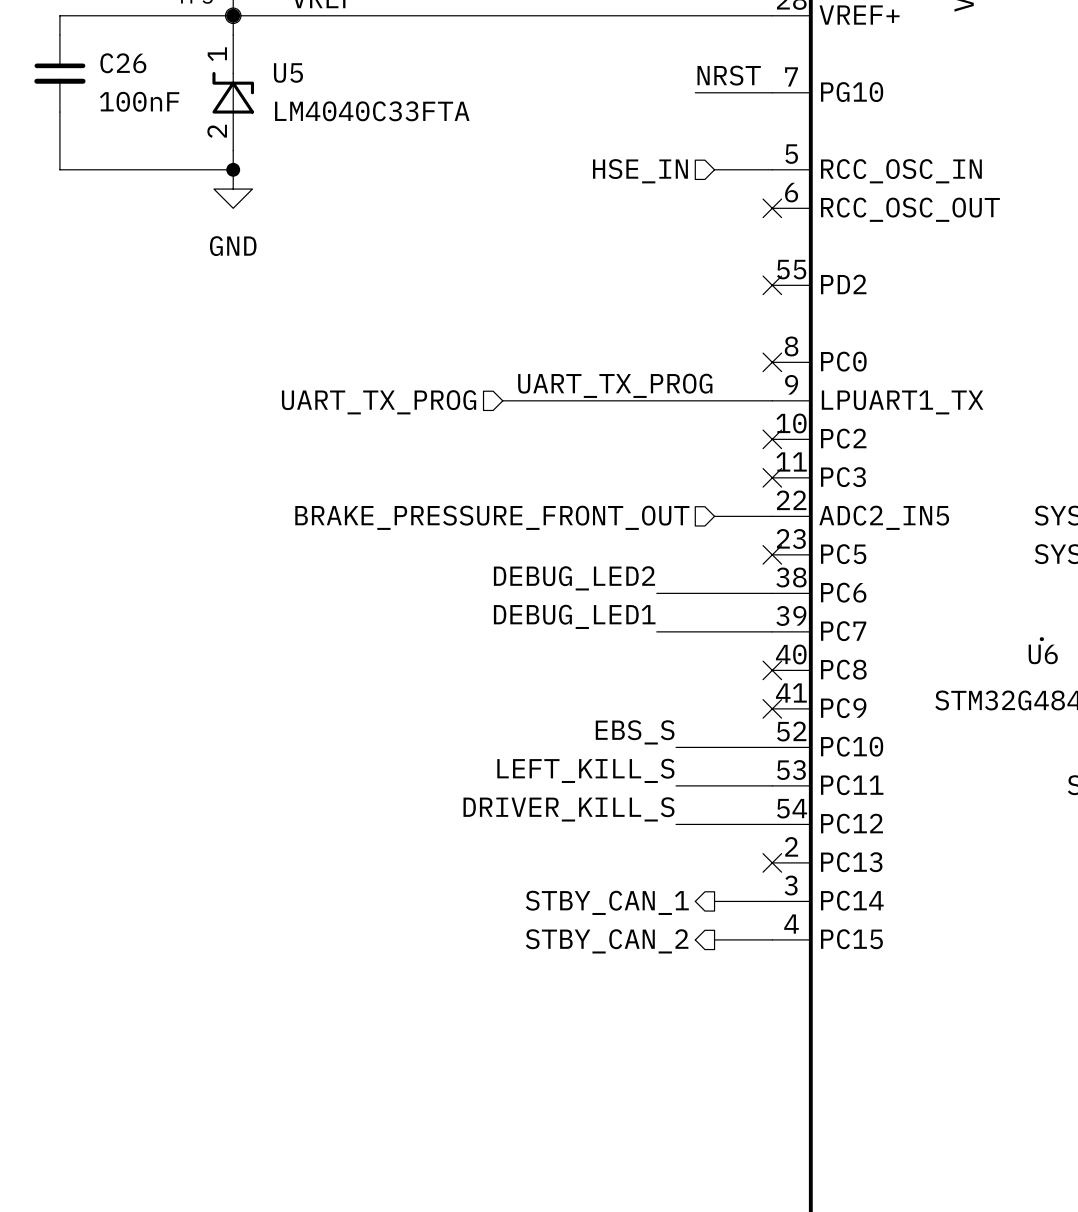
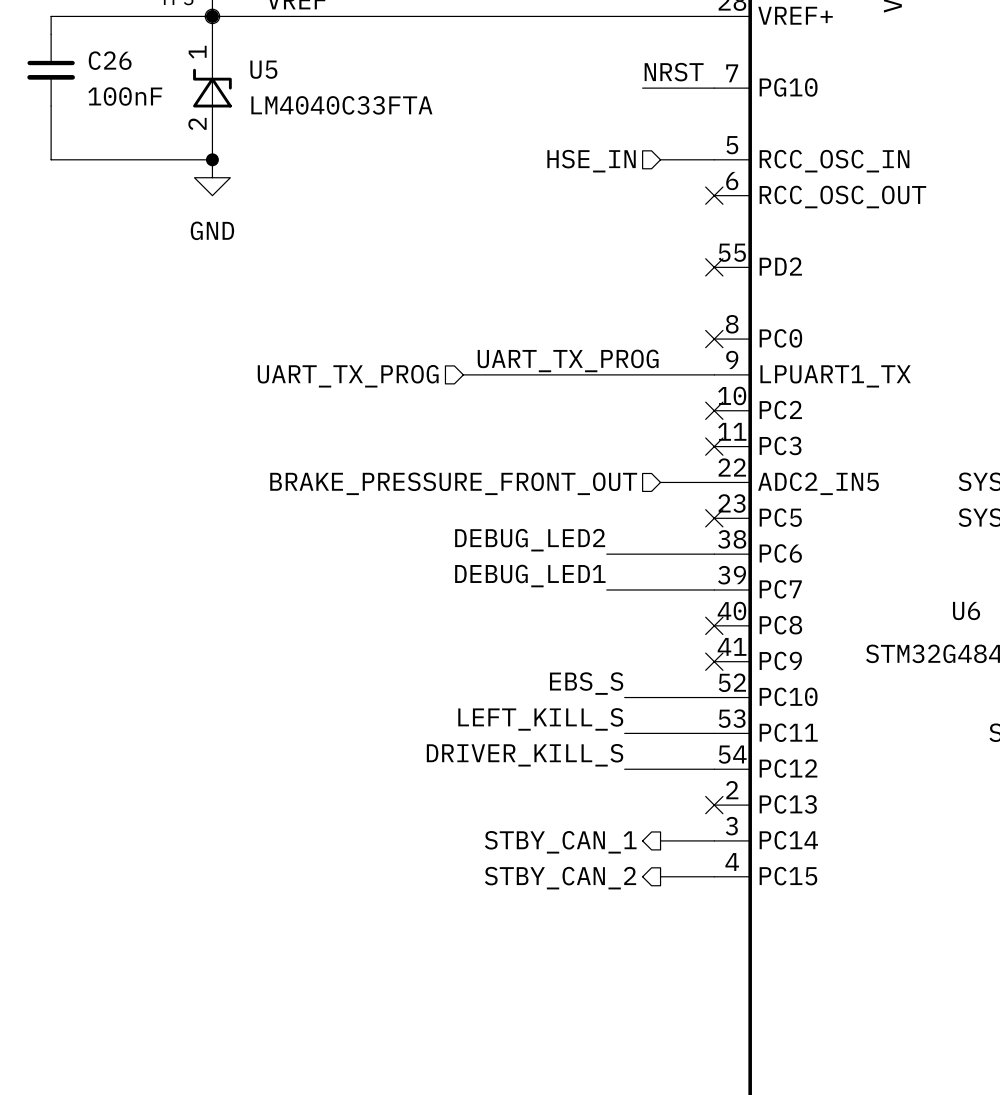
U6 text: . (1041, 639) -> none

